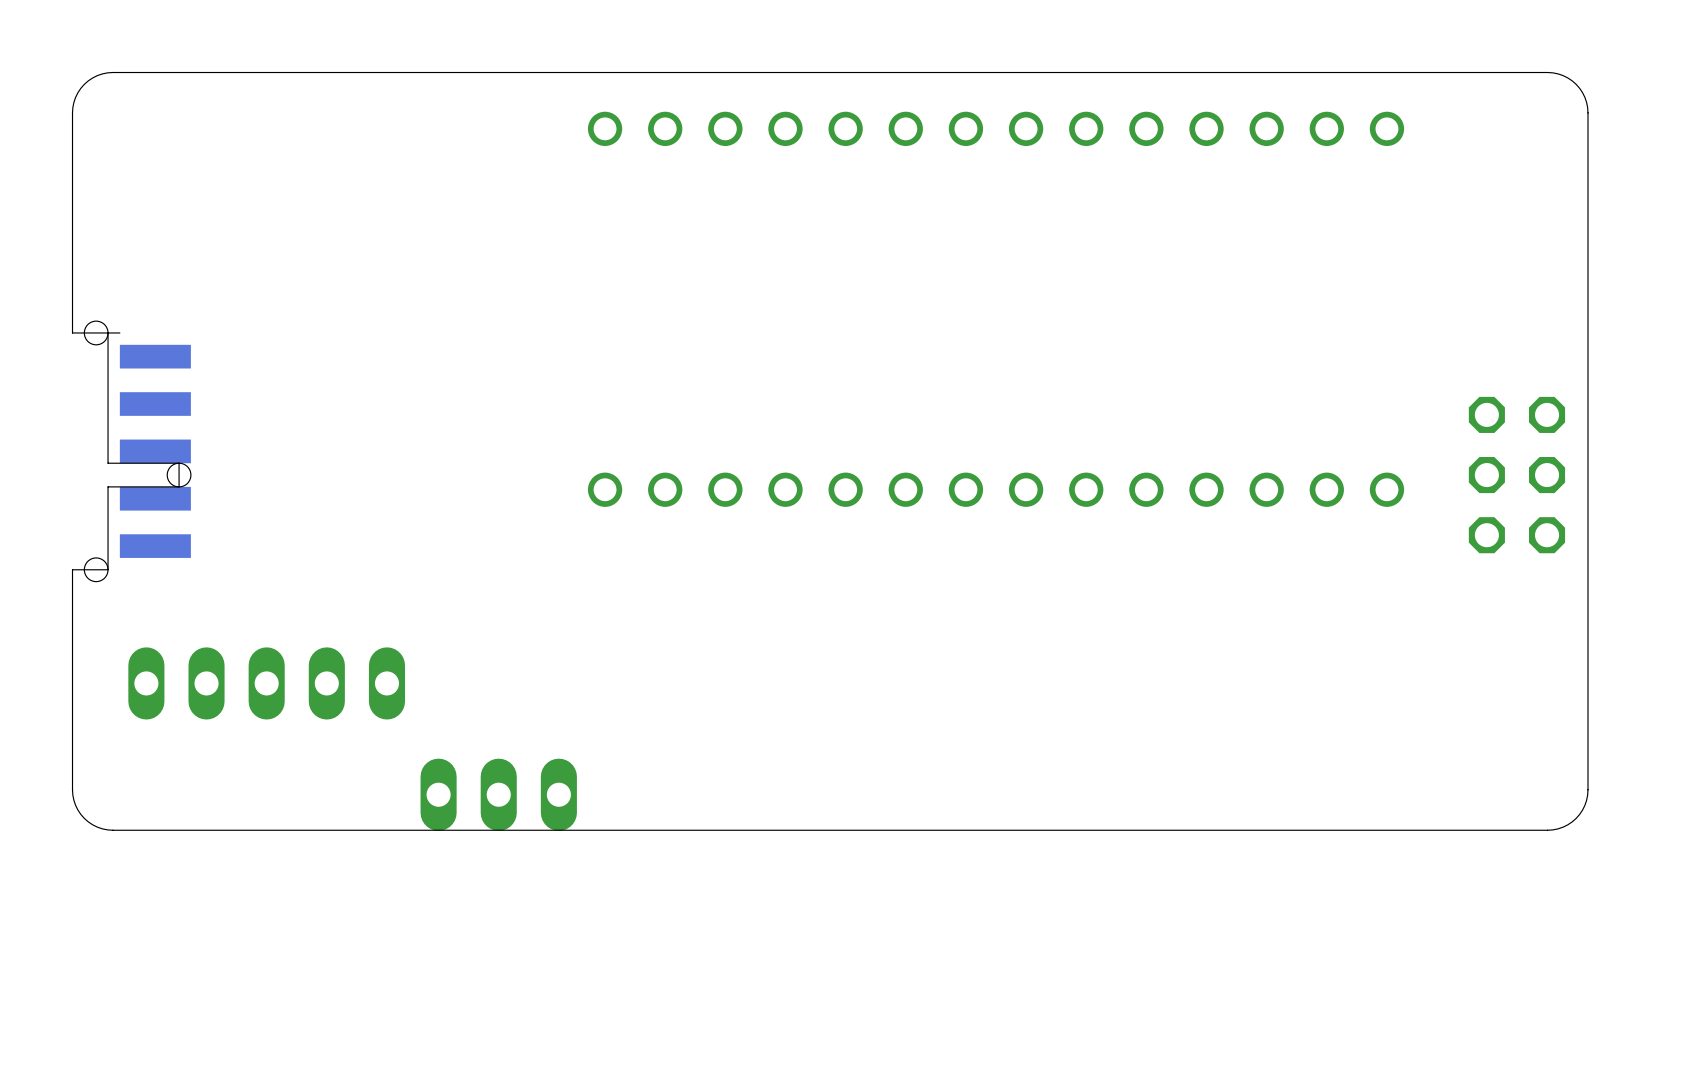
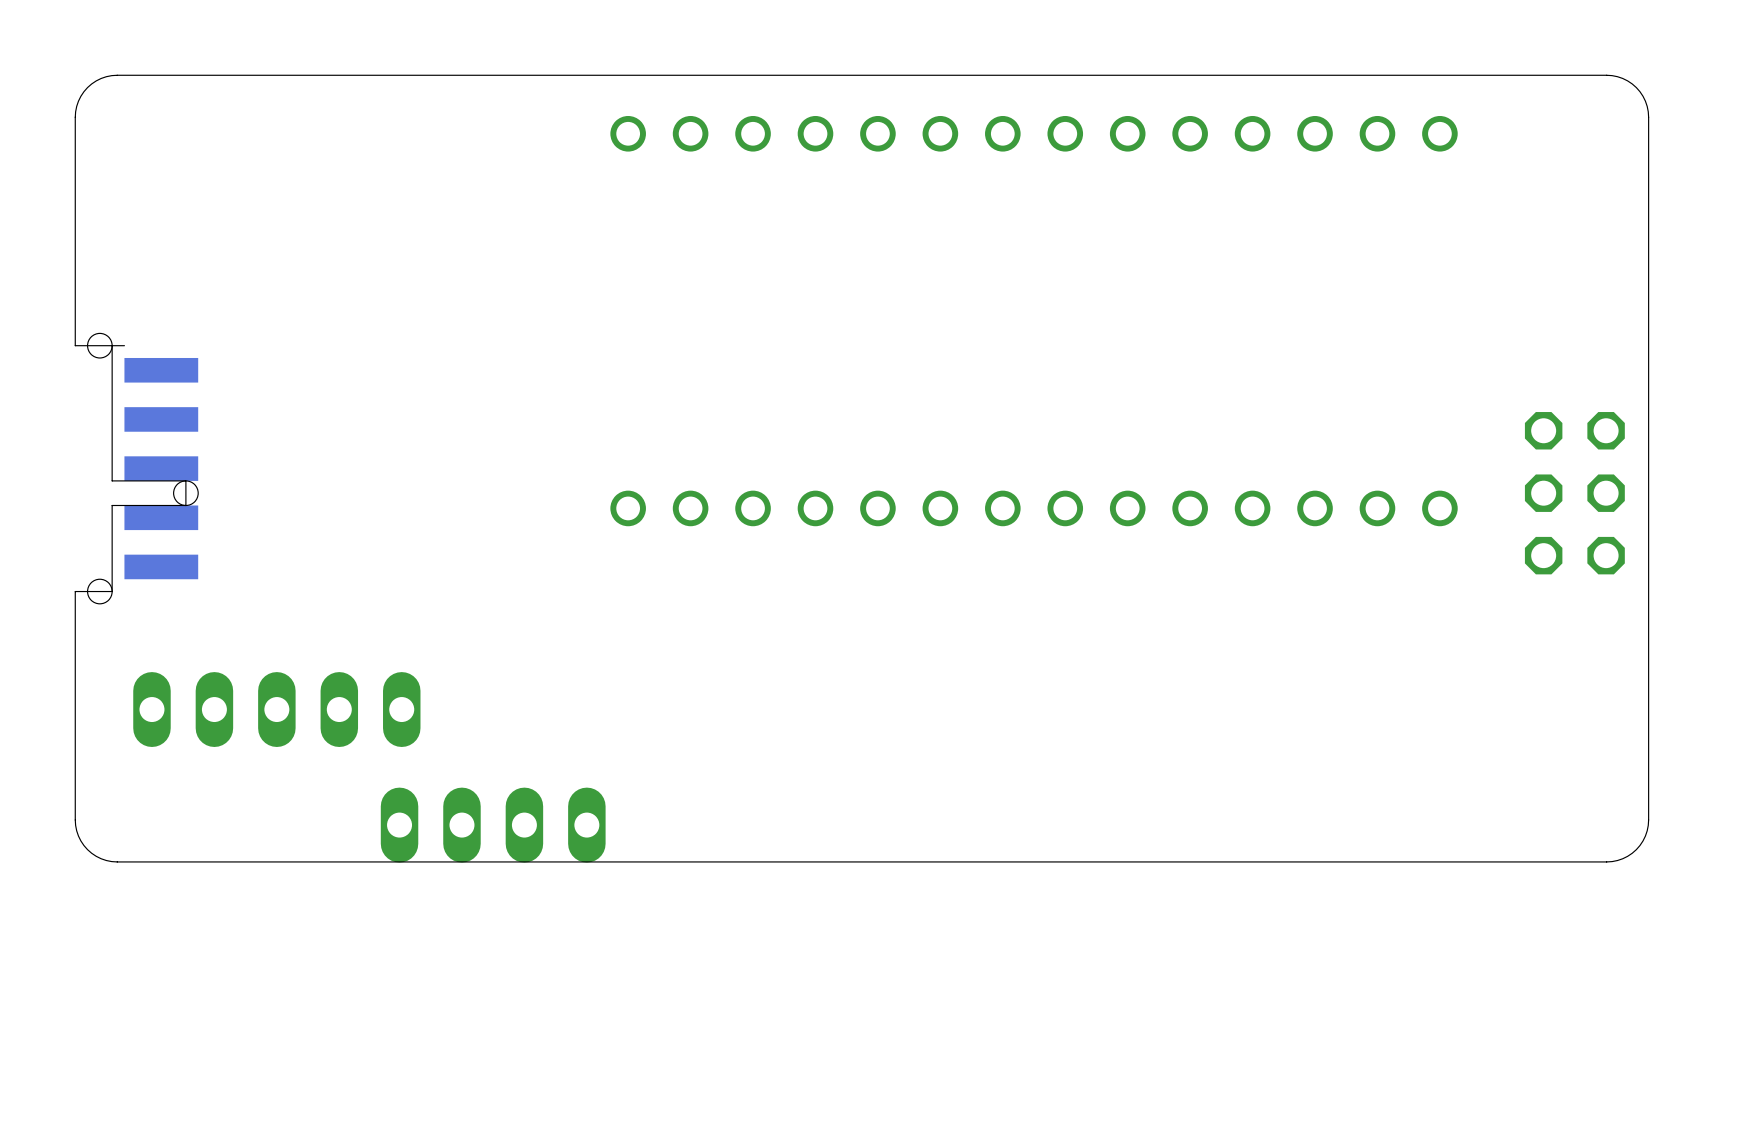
part footprint: [420, 758, 577, 831] -> [380, 787, 606, 863]

